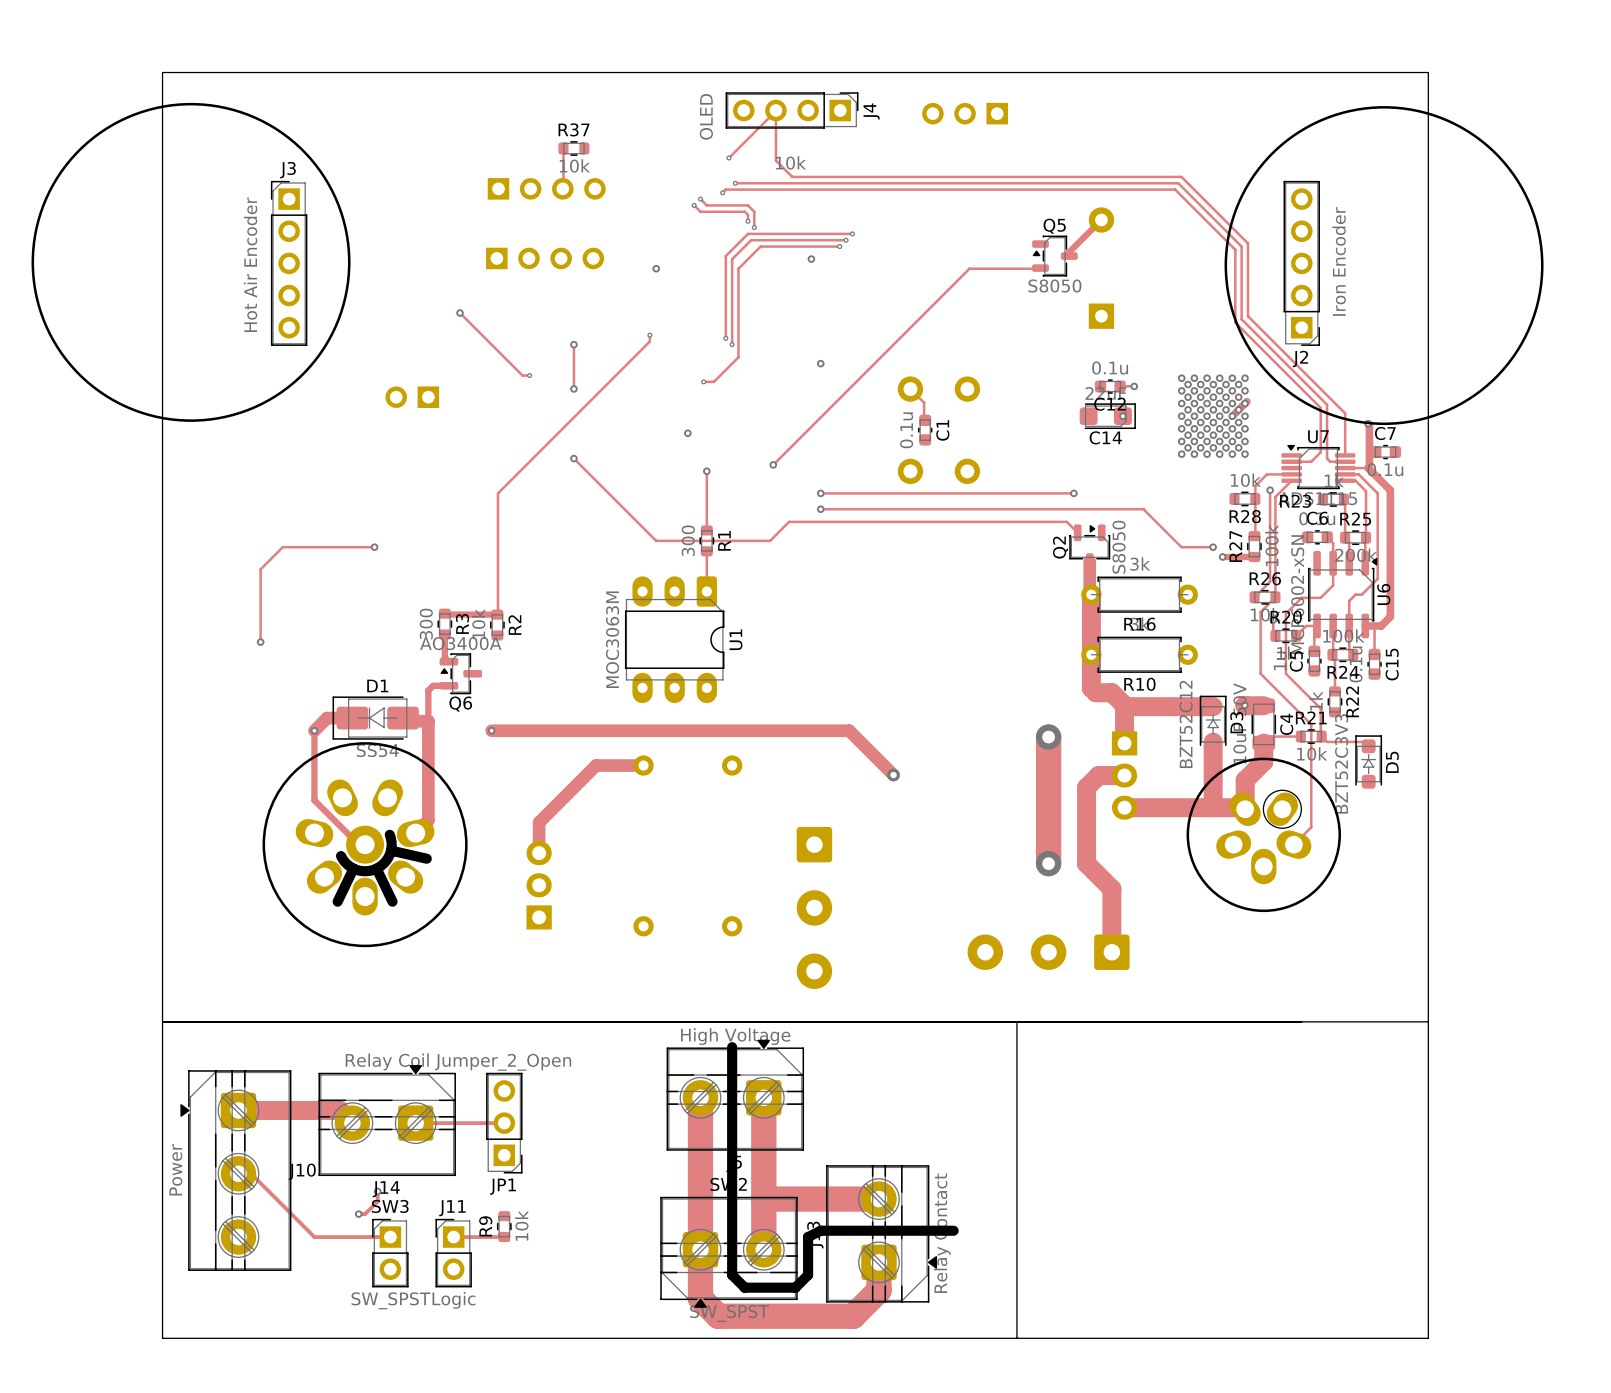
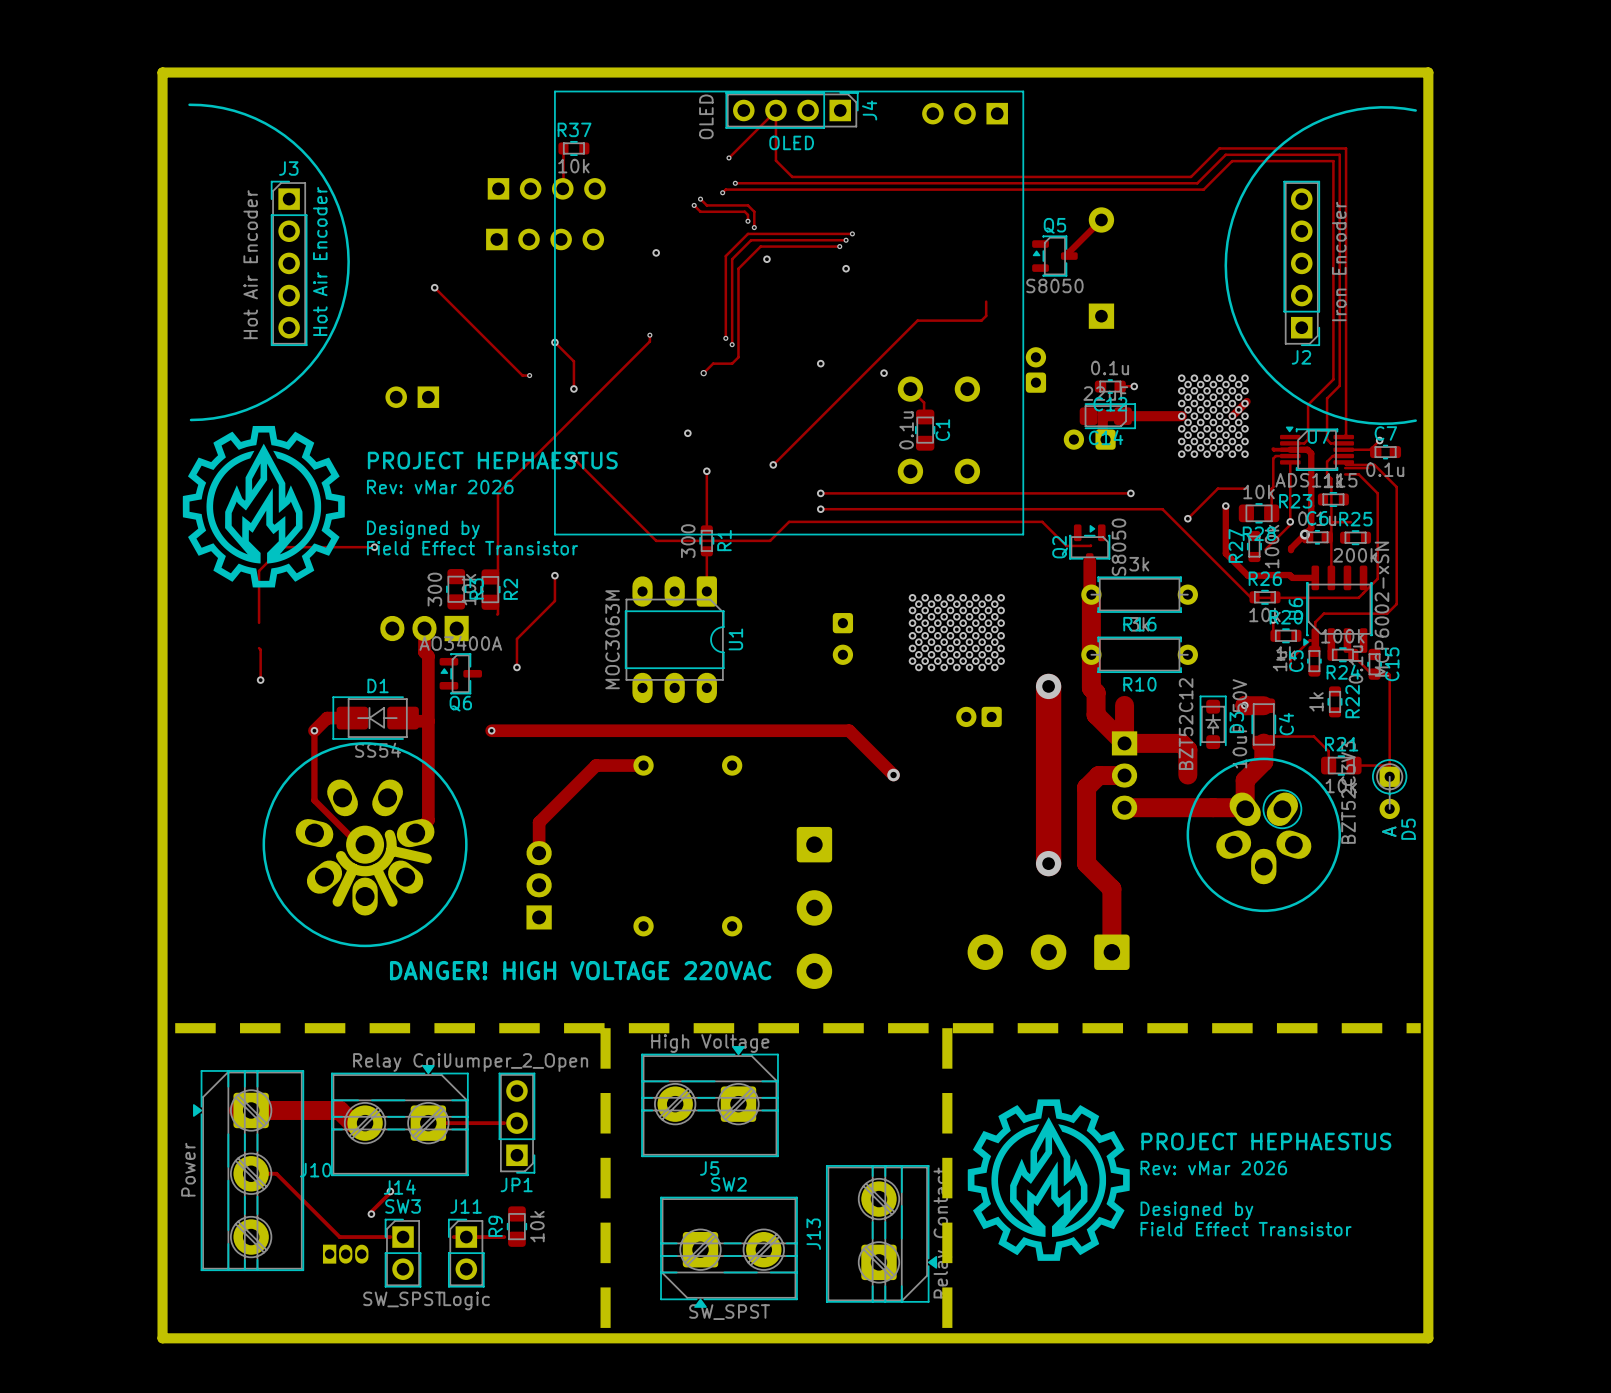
board edge width: thin (162, 72) (1428, 72) (1428, 1338) (162, 1338) (162, 72) -> thick (162, 72) (1428, 72) (1428, 1338) (162, 1338) (162, 72)
line: none -> (554, 91) (1023, 91) (1023, 534) (554, 534) (554, 91)
drawing: [31, 102, 351, 422] -> none
line: none -> (189, 104) (212, 106) (244, 114) (275, 129) (301, 150) (323, 176) (333, 196) (344, 228) (348, 261) (347, 284) (338, 316) (323, 347) (302, 373) (276, 394) (256, 405) (224, 416) (191, 420)
drawing: [1224, 106, 1544, 426] -> none
line: none -> (1415, 110) (1380, 107) (1346, 111) (1313, 123) (1283, 142) (1259, 167) (1241, 197) (1229, 230) (1225, 265) (1229, 300) (1241, 333) (1259, 363) (1283, 388) (1313, 407) (1346, 419) (1380, 423) (1415, 420)
text: none -> OLED (791, 142)
part: 10k (790, 162) -> none
track: (1181, 176) (1247, 243) (1247, 316) (1345, 413) (1345, 455) -> (1181, 176) (1191, 176) (1219, 148) (1346, 148) (1346, 434) (1343, 437)
track: (1178, 183) (1241, 246) (1241, 319) (1327, 404) -> (1178, 183) (1197, 183) (1225, 154) (1339, 154) (1339, 385) (1327, 398) (1327, 404)
track: (1175, 189) (1235, 249) (1235, 322) (1320, 407) (1320, 452) (1311, 461) (1291, 461) -> (1175, 189) (1203, 189) (1232, 161) (1333, 161) (1333, 379) (1308, 404) (1308, 439) (1304, 443) (1290, 443)
part position: (545, 258) -> (545, 239)
via: none -> (766, 259)
via: (811, 259) -> none
text: none -> Hot Air Encoder (320, 261)
via position: (656, 268) -> (656, 252)
via: none -> (846, 268)
track: (1040, 268) (969, 268) (917, 320) -> (986, 301) (986, 315) (981, 320) (917, 320)
track: none -> (434, 287) (460, 313)
via position: (460, 313) -> (434, 287)
track: (573, 344) (573, 361) -> (554, 342) (573, 361)
via position: (573, 344) -> (554, 342)
track: (732, 363) (713, 381) (703, 381) -> (732, 363) (713, 363) (703, 373)
part: none -> (1035, 369)
via: none -> (703, 373)
via: none -> (884, 373)
via: (703, 381) -> none
C1 footprint: [917, 414, 933, 446] -> [915, 409, 936, 451]
via: (1122, 416) -> none
track: none -> (1181, 416) (1104, 416) (1102, 414) (1102, 436) (1105, 439)
track: (1368, 423) (1368, 468) (1390, 490) (1390, 616) (1381, 625) (1365, 625) (1374, 625) (1374, 654) -> none
via position: (1368, 423) -> (1379, 440)
drawing: none -> [182, 425, 345, 588]
part: none -> (1089, 439)
track: (1327, 439) (1327, 458) (1330, 461) (1345, 461) -> (1327, 439) (1330, 443) (1343, 443)
track: none -> (1379, 440) (1370, 449) (1343, 449)
track: none -> (1273, 449) (1307, 449) (1311, 453) (1311, 528) (1291, 550)
track: none -> (1290, 456) (1275, 456) (1273, 458) (1271, 513)
track: none -> (1343, 456) (1332, 456) (1327, 461) (1327, 474) (1331, 478) (1331, 577)
text: none -> PROJECT HEPHAESTUS (492, 460)
track: none -> (1290, 462) (1290, 524) (1265, 549)
track: none -> (1343, 462) (1346, 464) (1374, 464) (1396, 487) (1396, 604) (1387, 613) (1323, 613) (1315, 622) (1315, 640) (1309, 640) (1290, 659) (1290, 669)
U7 position: (1318, 467) -> (1317, 448)
track: (1291, 474) (1266, 474) (1255, 485) (1254, 536) -> none
track: (1291, 480) (1275, 497) (1275, 597) (1260, 612) (1260, 673) (1311, 724) (1311, 827) (1293, 844) -> none
track: (1345, 480) (1355, 480) (1366, 491) (1365, 563) -> none
text: none -> Rev: vMar 2026 (440, 487)
track: none -> (1246, 488) (1217, 488) (1187, 518)
track: (1270, 490) (1270, 581) (1254, 597) -> none
via: (1270, 490) -> none
R28 footprint: [1229, 491, 1261, 507] -> [1238, 503, 1280, 524]
track: none -> (1073, 493) (1130, 493)
via: (1073, 493) -> none
via: none -> (1130, 493)
track: (1343, 499) (1345, 537) (1349, 541) (1349, 563) -> none
track: none -> (1225, 506) (1225, 553) (1247, 575) (1289, 575) (1292, 577) (1315, 577)
via: none -> (1225, 506)
track: (1143, 509) (1181, 547) (1213, 547) -> (1143, 509) (1162, 509) (1251, 597) (1301, 597)
via: none -> (1187, 518)
track: (1042, 521) (1066, 521) (1077, 532) -> (1042, 521) (1066, 545) (1091, 545)
via: none -> (1290, 521)
track: none -> (1331, 521) (1350, 522)
text: none -> Designed by (423, 529)
via: none -> (1304, 534)
track: (1327, 537) (1333, 543) (1333, 585) (1320, 597) -> none
via: (1213, 547) -> none
text: none -> Field Effect Transistor (472, 548)
track: (1222, 557) (1254, 557) -> none
via: (1222, 557) -> none
track: (260, 569) (260, 642) -> (260, 569) (259, 570) (259, 622)
track: none -> (554, 575) (554, 600) (516, 638) (516, 667)
via: none -> (554, 575)
U6 rotation: 0° (1342, 594) -> 180° (1337, 609)
track: (1361, 594) (1355, 594) (1349, 600) (1349, 650) (1353, 654) -> (1361, 594) (1358, 597) (1320, 597)
via: none -> (912, 597)
via: none -> (925, 597)
via: none -> (937, 597)
via: none -> (950, 597)
via: none -> (963, 597)
via: none -> (975, 597)
via: none -> (988, 597)
via: none -> (1001, 597)
track: (1301, 597) (1285, 613) (1285, 673) (1320, 708) (1320, 735) (1327, 741) (1364, 741) (1368, 746) -> none
via: none -> (918, 604)
via: none -> (931, 604)
via: none -> (944, 604)
via: none -> (956, 604)
via: none -> (969, 604)
via: none -> (982, 604)
via: none -> (994, 604)
R3 footprint: [437, 608, 453, 640] -> [446, 569, 467, 610]
R2 footprint: [490, 609, 505, 641] -> [480, 569, 501, 610]
via: none -> (912, 610)
via: none -> (925, 610)
via: none -> (937, 610)
via: none -> (950, 610)
via: none -> (963, 610)
via: none -> (975, 610)
via: none -> (988, 610)
via: none -> (1001, 610)
track: (444, 613) (497, 614) -> none
via: none -> (918, 616)
via: none -> (931, 616)
via: none -> (944, 616)
via: none -> (956, 616)
via: none -> (969, 616)
via: none -> (982, 616)
via: none -> (994, 616)
via: none -> (912, 623)
via: none -> (925, 623)
via: none -> (937, 623)
via: none -> (950, 623)
via: none -> (963, 623)
via: none -> (975, 623)
via: none -> (988, 623)
via: none -> (1001, 623)
track: (1333, 625) (1332, 654) (1334, 657) (1334, 691) -> none
part: none -> (424, 628)
via: none -> (918, 629)
via: none -> (931, 629)
via: none -> (944, 629)
via: none -> (956, 629)
via: none -> (969, 629)
via: none -> (982, 629)
via: none -> (994, 629)
track: (444, 634) (444, 657) (448, 661) -> none
via: none -> (912, 635)
via: none -> (925, 635)
via: none -> (937, 635)
via: none -> (950, 635)
via: none -> (963, 635)
via: none -> (975, 635)
via: none -> (988, 635)
via: none -> (1001, 635)
track: (1296, 635) (1306, 625) (1317, 625) (1314, 628) (1314, 651) -> none
part: none -> (842, 638)
track: none -> (1347, 640) (1347, 649) (1371, 673) (1389, 674) (1389, 776)
via position: (260, 642) -> (260, 680)
via: none -> (918, 642)
via: none -> (931, 642)
via: none -> (944, 642)
via: none -> (956, 642)
via: none -> (969, 642)
via: none -> (982, 642)
via: none -> (994, 642)
track: none -> (259, 648) (260, 649) (260, 680)
via: none -> (912, 648)
via: none -> (925, 648)
via: none -> (937, 648)
via: none -> (950, 648)
via: none -> (963, 648)
via: none -> (975, 648)
via: none -> (988, 648)
via: none -> (1001, 648)
via: none -> (918, 654)
via: none -> (931, 654)
via: none -> (944, 654)
via: none -> (956, 654)
via: none -> (969, 654)
via: none -> (982, 654)
via: none -> (994, 654)
via: none -> (912, 661)
via: none -> (925, 661)
via: none -> (937, 661)
via: none -> (950, 661)
via: none -> (963, 661)
via: none -> (975, 661)
via: none -> (988, 661)
via: none -> (1001, 661)
via: none -> (516, 667)
via: none -> (918, 667)
via: none -> (931, 667)
via: none -> (944, 667)
via: none -> (956, 667)
via: none -> (969, 667)
via: none -> (982, 667)
via: none -> (994, 667)
track: (448, 685) (433, 685) (428, 690) -> (424, 628) (424, 652) (428, 656) (428, 690)
track: none -> (1048, 686) (1048, 737)
track width: thin (428, 690) (428, 721) -> thick (428, 690) (428, 721)
track: (1096, 692) (1111, 692) (1125, 706) (1213, 706) -> (1096, 692) (1096, 714) (1124, 743) (1181, 743) (1187, 749) (1187, 775)
part: none -> (978, 716)
R21 footprint: [1295, 729, 1327, 744] -> [1321, 755, 1362, 776]
D5 footprint: [1355, 735, 1383, 789] -> [1372, 759, 1408, 820]
track: none -> (1300, 736) (1313, 736) (1328, 751) (1328, 765)
via position: (1048, 737) -> (1048, 686)
track: (1213, 742) (1213, 807) -> none
D5 name position: D5 (1392, 762) -> D5 (1408, 829)
track: none -> (1353, 765) (1389, 765)
text: none -> DANGER! HIGH VOLTAGE 220VAC (580, 970)
board edge: (162, 1021) (1428, 1021) -> none
board edge: (1016, 1021) (1016, 1338) -> none
board edge: none -> (175, 1028) (1420, 1028)
board edge: none -> (605, 1028) (605, 1328)
board edge: none -> (947, 1028) (947, 1328)
board edge: (732, 1047) (732, 1275) (744, 1287) (795, 1287) (808, 1275) (808, 1237) (820, 1230) (953, 1230) -> none
J5 position: (735, 1095) -> (710, 1101)
track: (700, 1097) (700, 1298) (718, 1316) (853, 1316) (878, 1290) (878, 1262) -> none
track: (763, 1097) (763, 1249) -> none
drawing: none -> [967, 1099, 1130, 1261]
J14 position: (387, 1120) -> (399, 1120)
JP1 position: (504, 1123) -> (516, 1123)
text: none -> PROJECT HEPHAESTUS (1266, 1141)
text: none -> Rev: vMar 2026 (1213, 1168)
J10 position: (235, 1170) -> (248, 1170)
track: (238, 1173) (251, 1173) (314, 1237) (339, 1237) -> (251, 1173) (276, 1173) (339, 1237)
track: (377, 1191) (377, 1201) (365, 1214) (358, 1214) -> none
via: (377, 1191) -> none
track: none -> (390, 1191) (371, 1211) (371, 1214)
via: none -> (390, 1191)
track: (763, 1199) (878, 1199) -> none
text: none -> Designed by (1196, 1210)
R9 footprint: [496, 1211, 512, 1243] -> [506, 1206, 528, 1247]
via: (358, 1214) -> none
via: none -> (371, 1214)
text: none -> Field Effect Transistor (1246, 1229)
SW3 position: (390, 1253) -> (403, 1253)
J11 position: (453, 1253) -> (466, 1253)
part: none -> (345, 1254)

